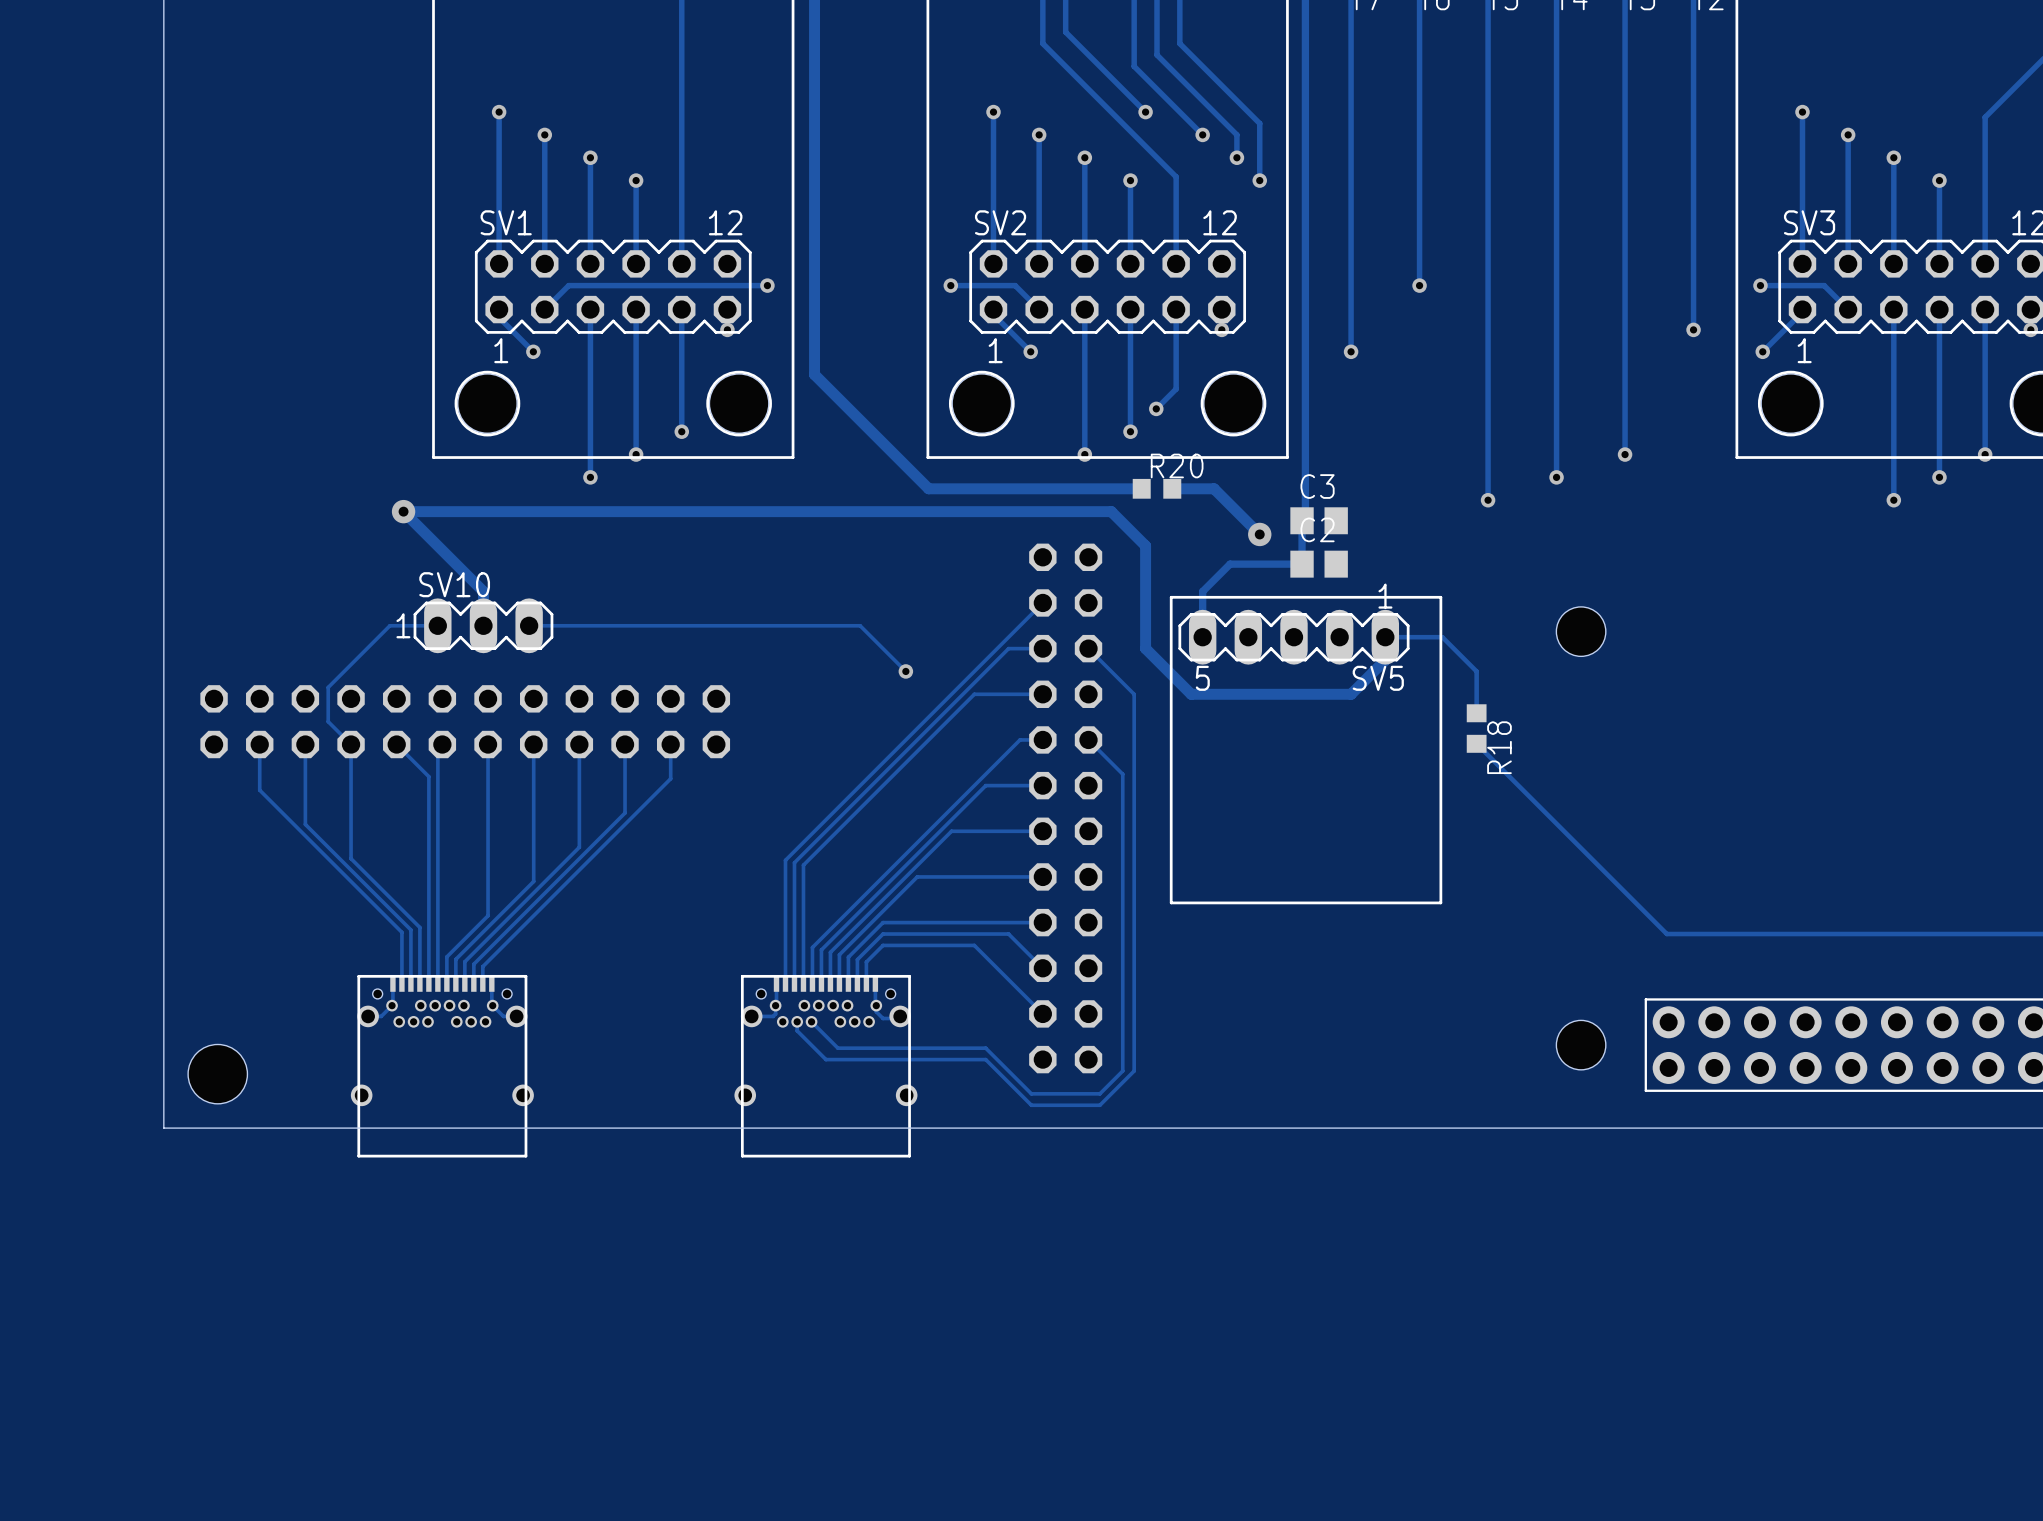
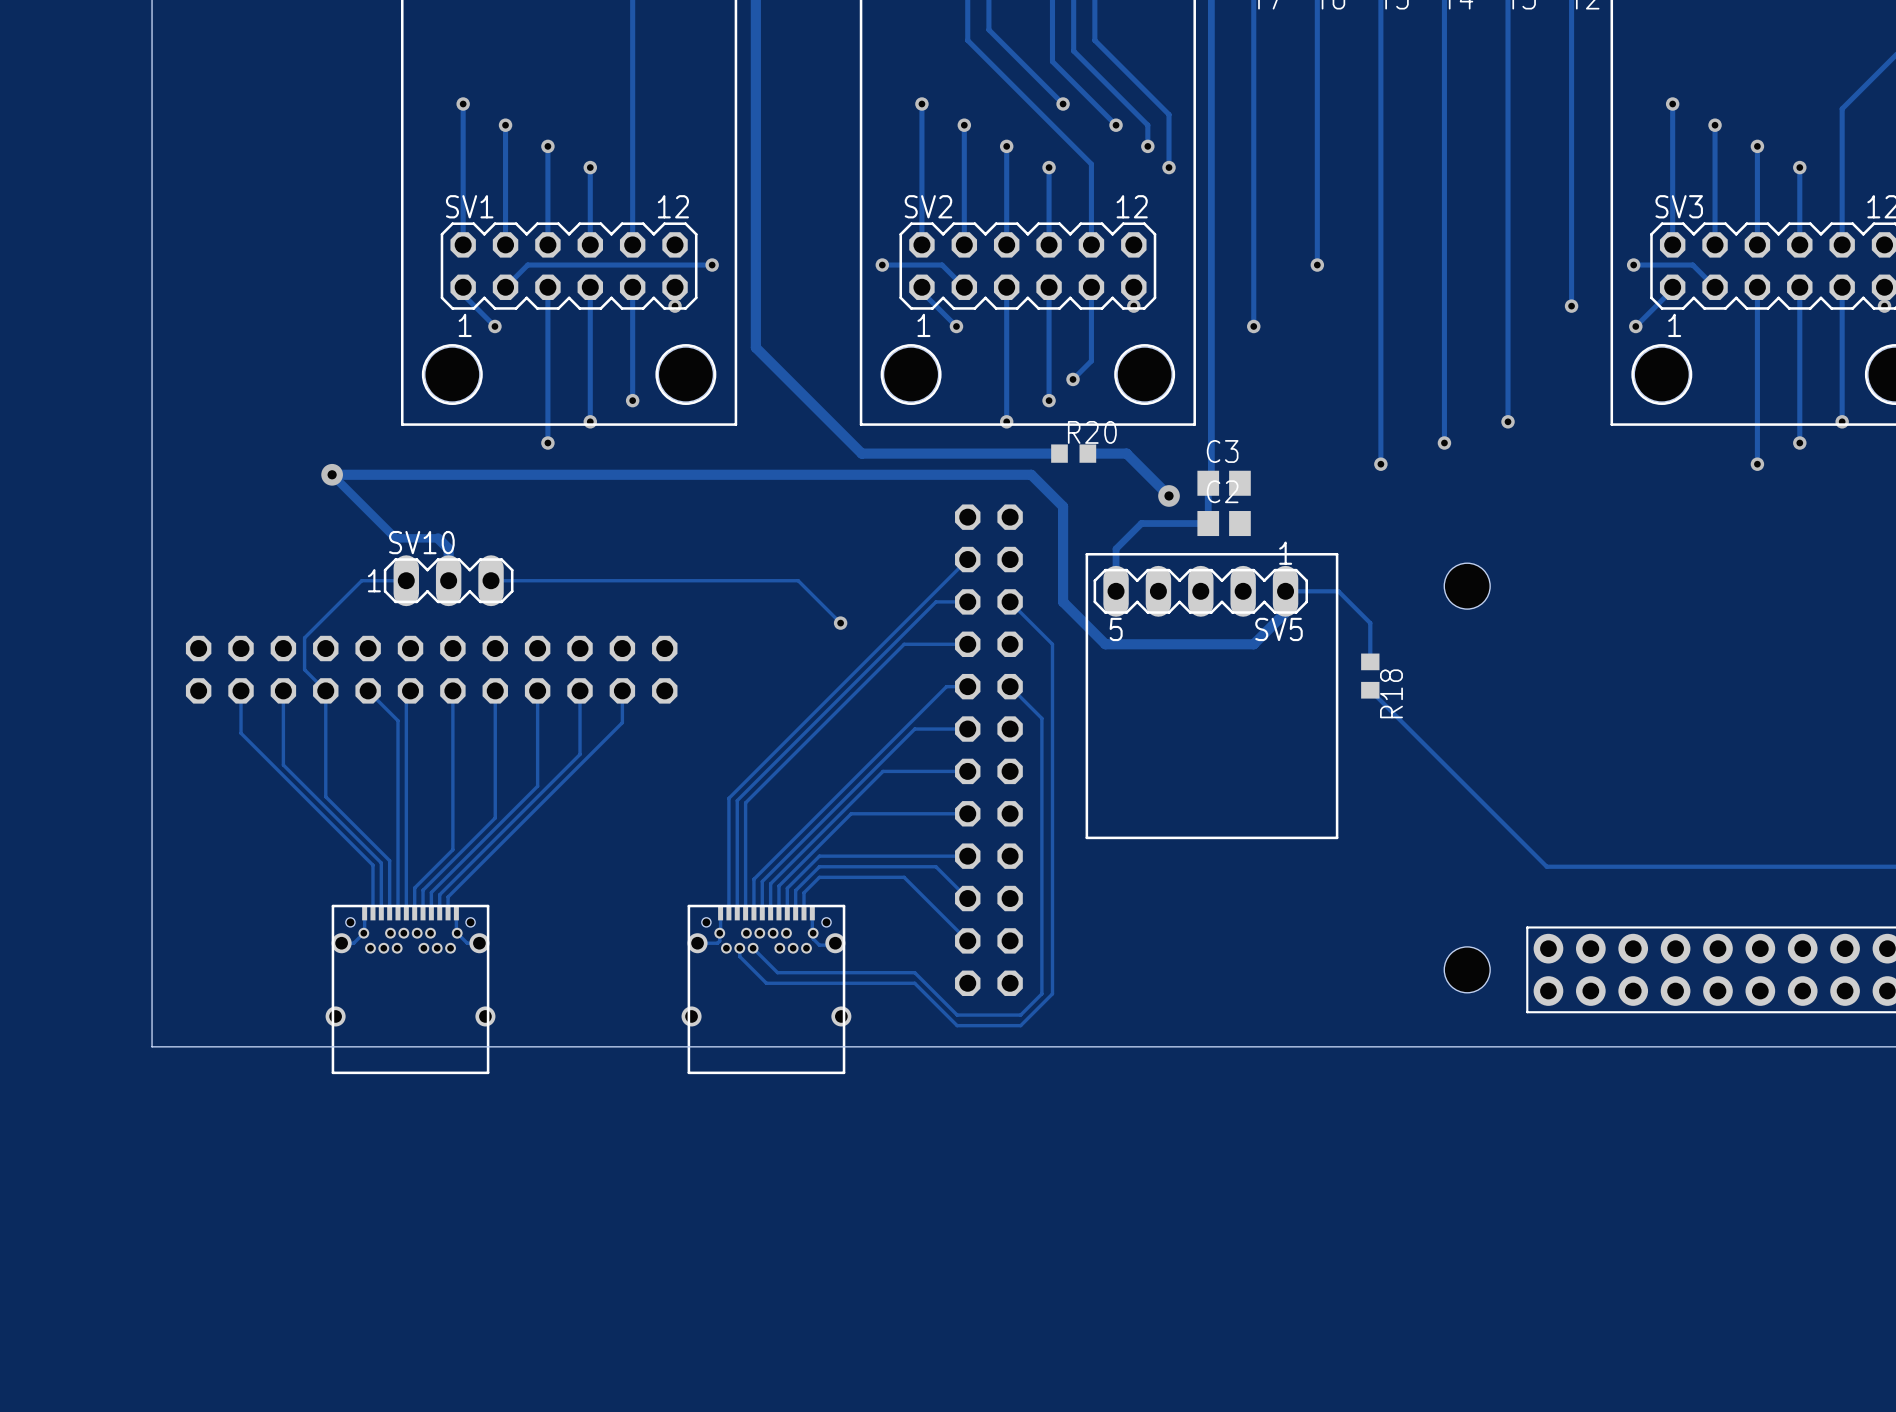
track: (403, 511) (472, 580) -> (374, 474) (332, 474) (395, 538) (438, 538)
via position: (403, 511) -> (332, 474)
hole: (217, 1074) -> none

